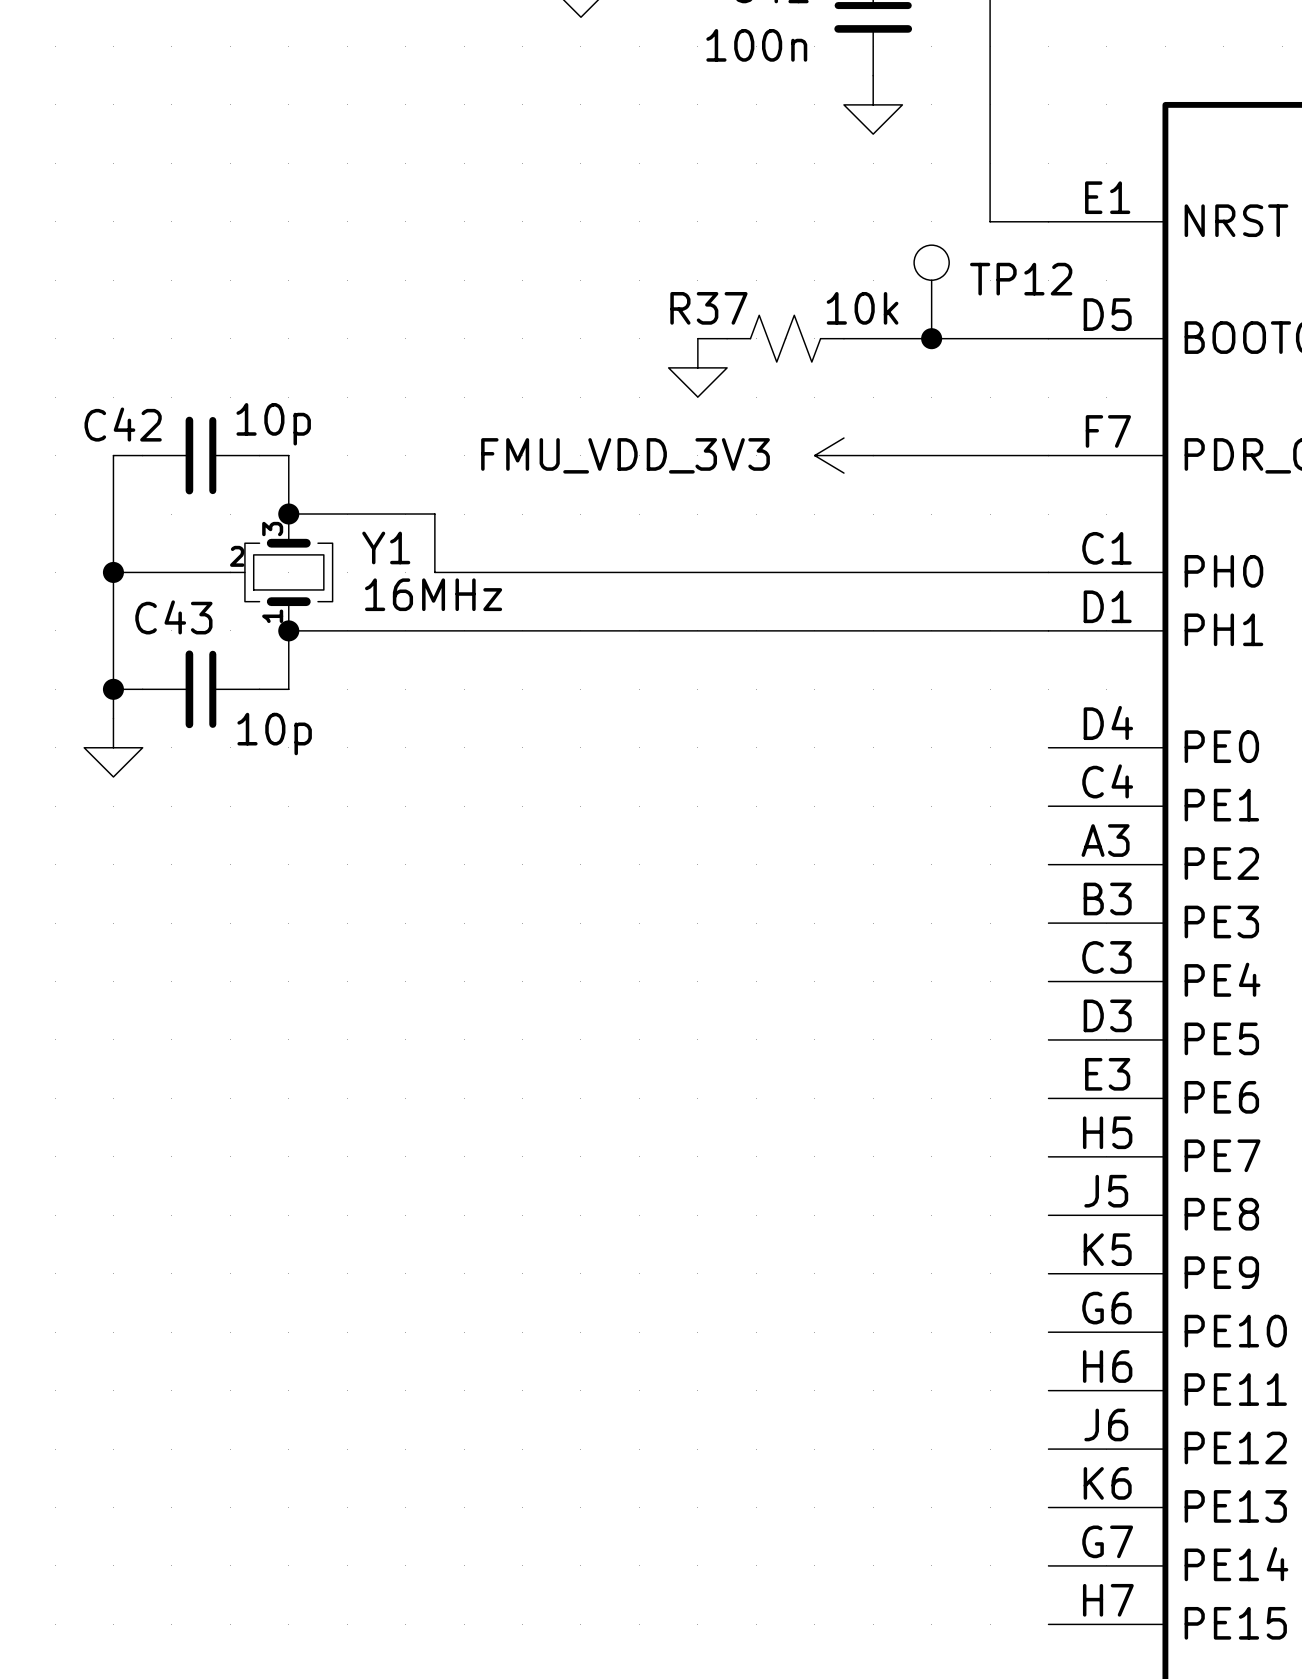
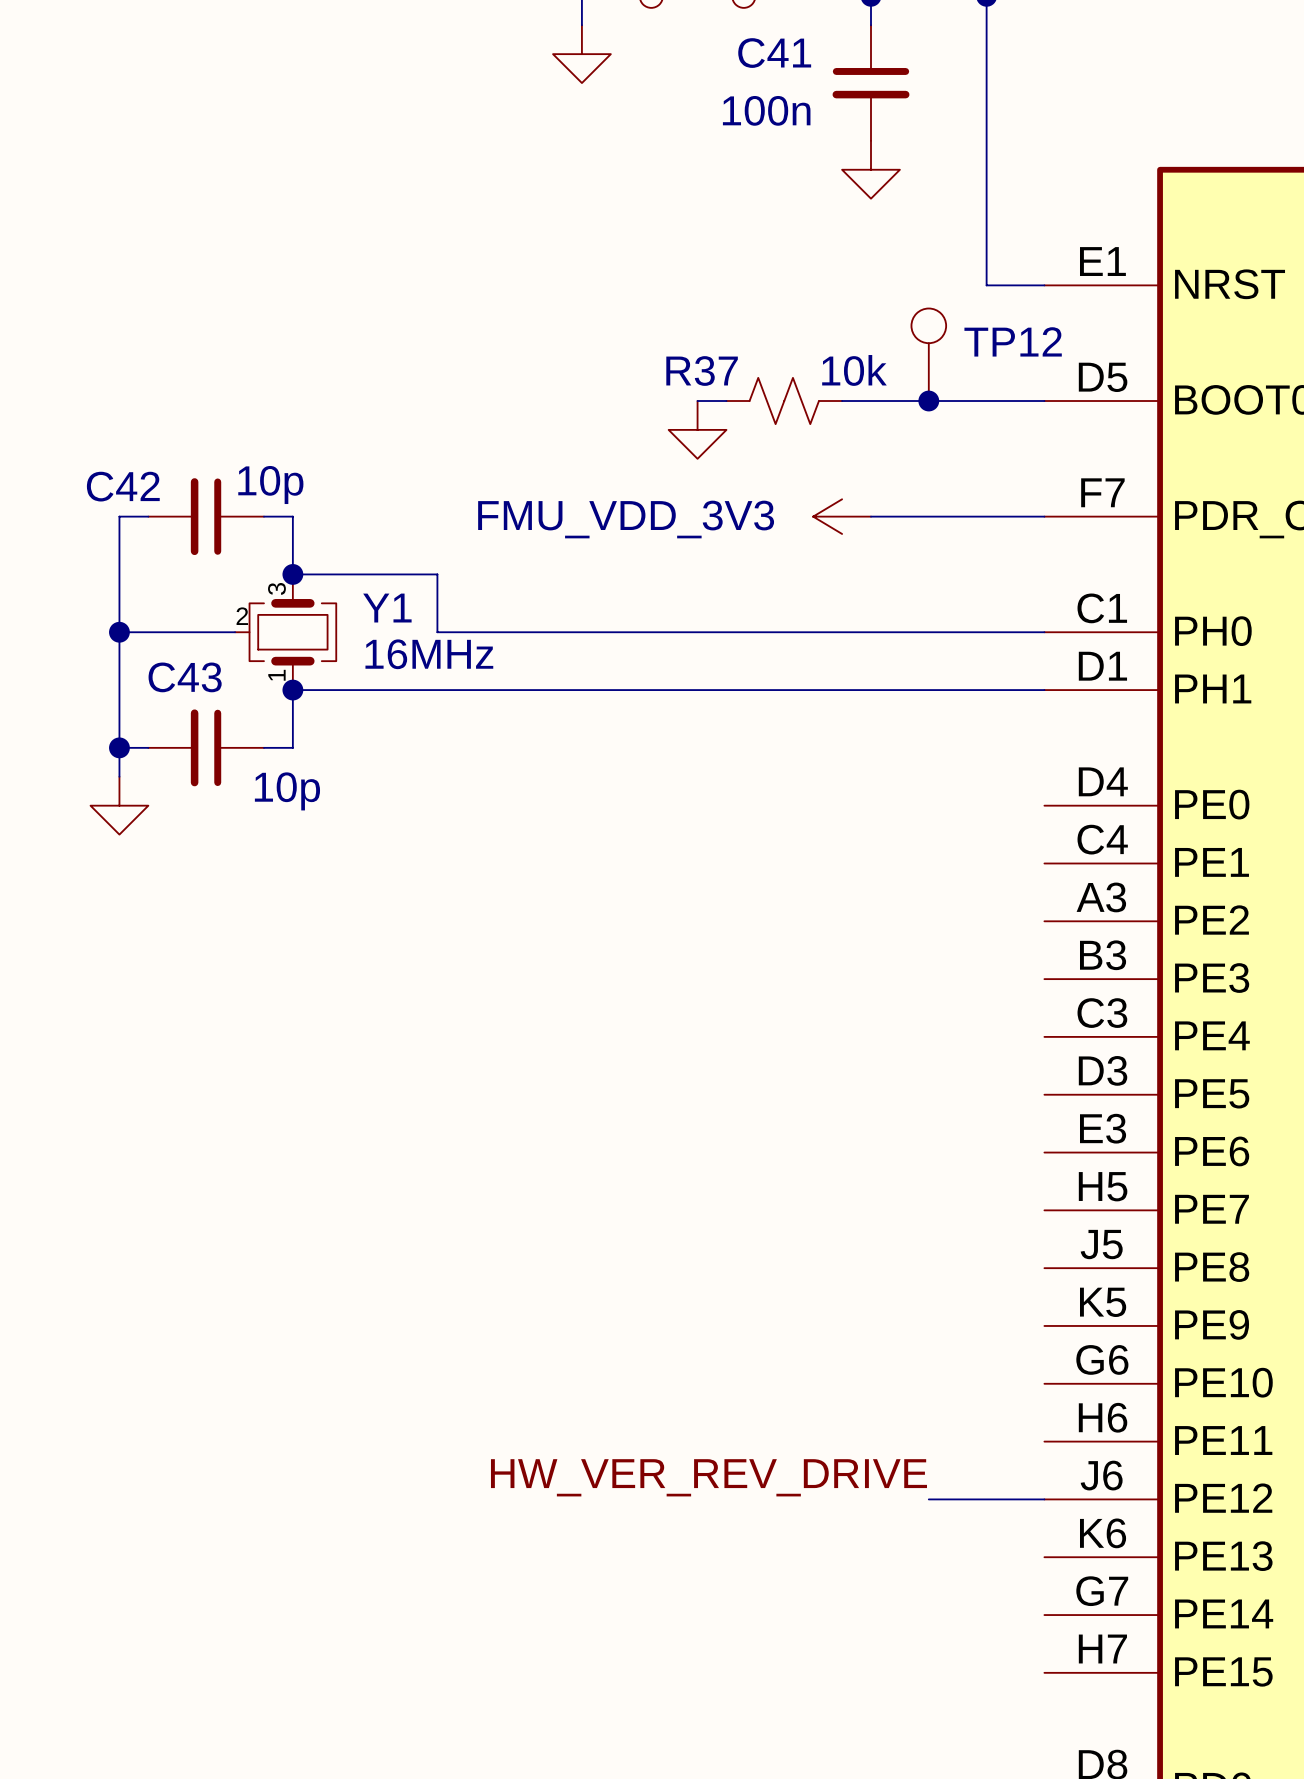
label: none -> HW_VER_REV_DRIVE (708, 1477)
wire: none -> (928, 1499) (1044, 1499)

